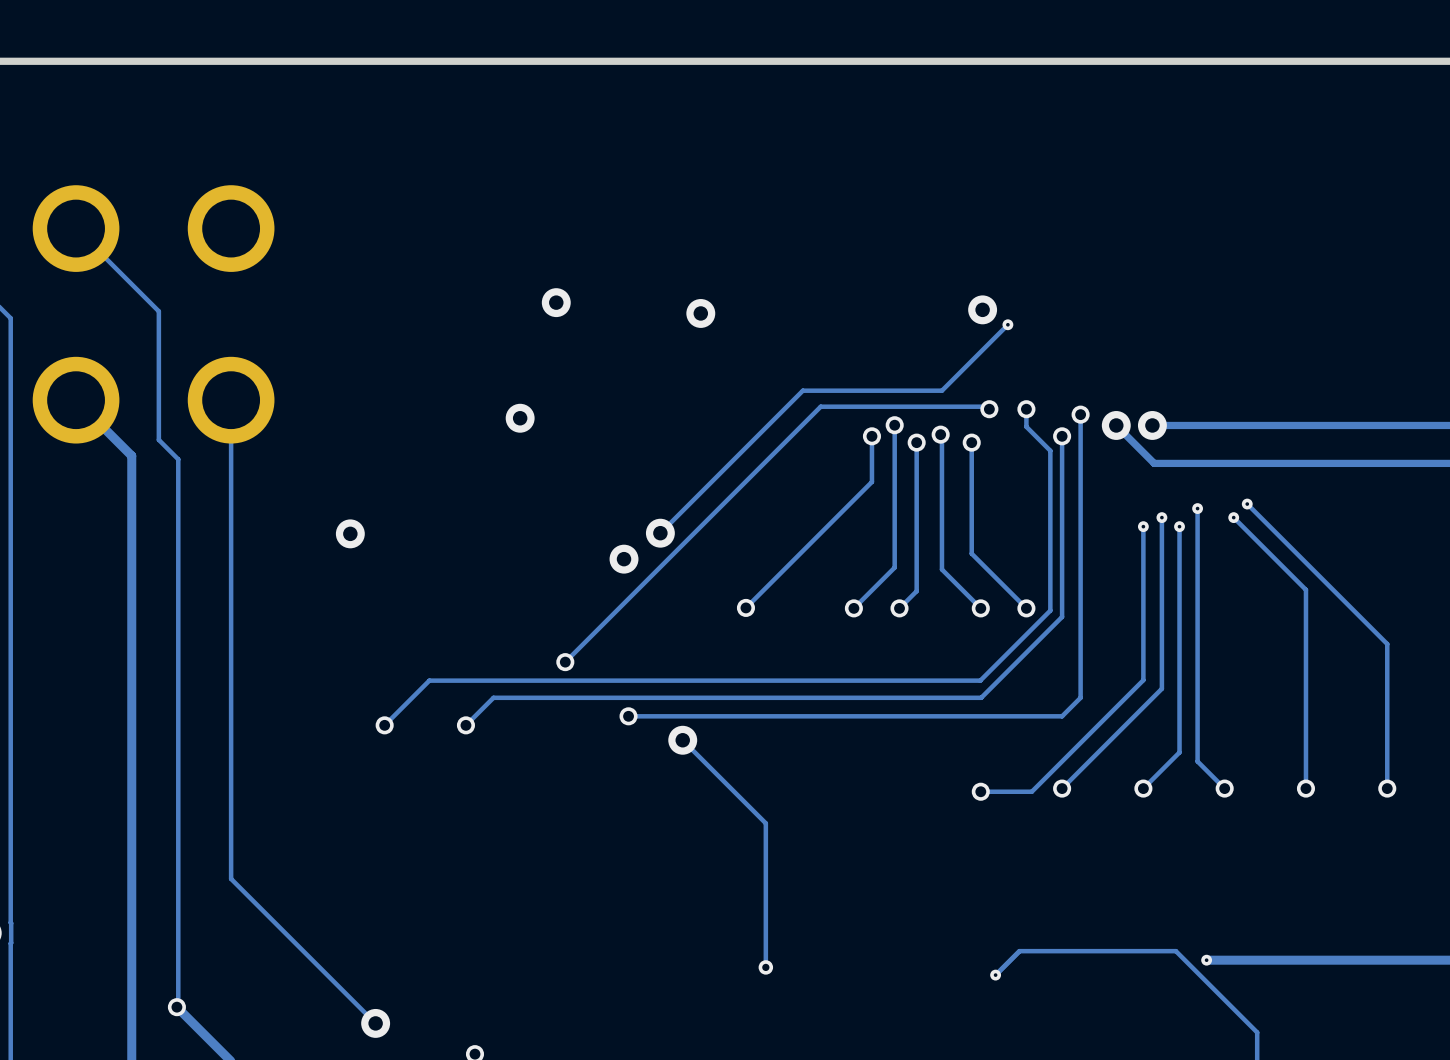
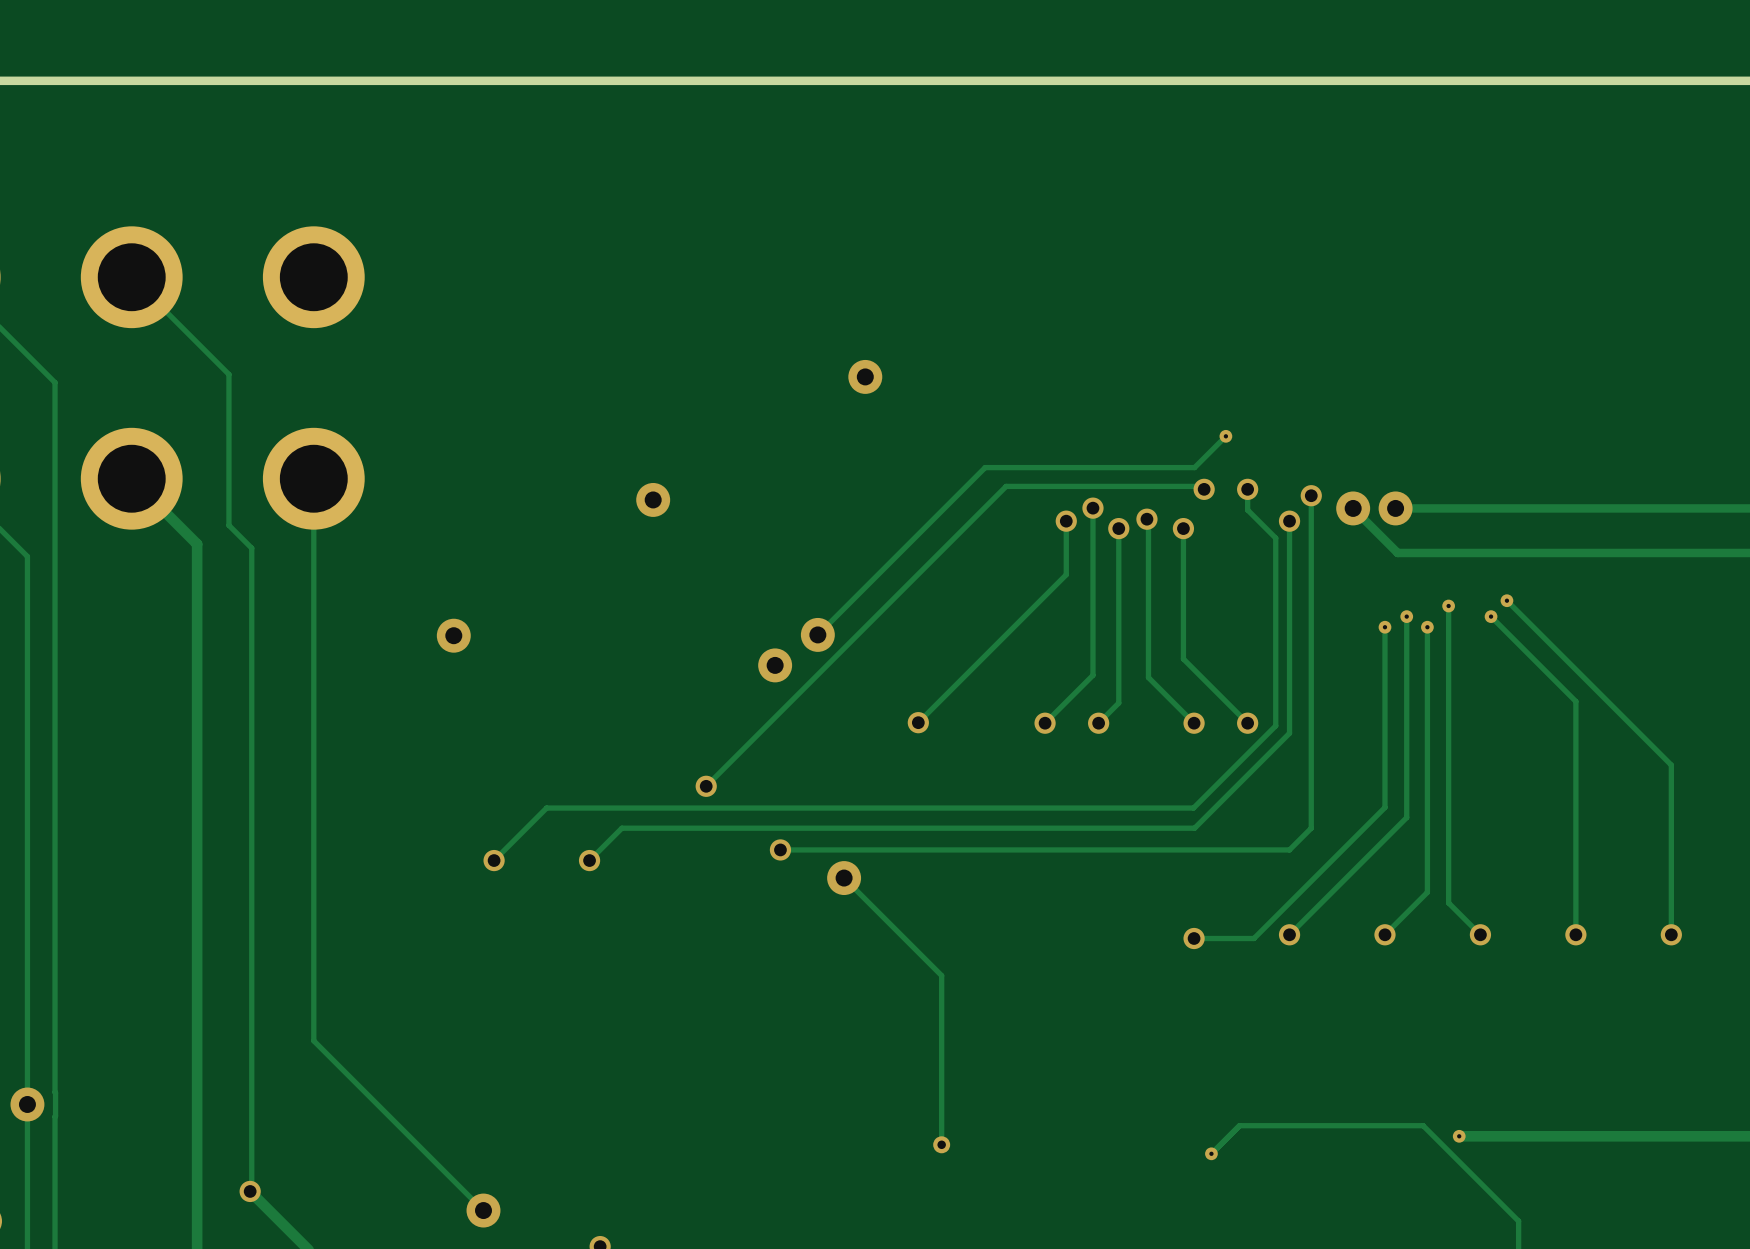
via: (556, 302) -> none
via: (982, 309) -> none
track: (1007, 324) (941, 390) -> (1225, 436) (1194, 467) (1148, 467)
via position: (1007, 324) -> (1225, 436)

